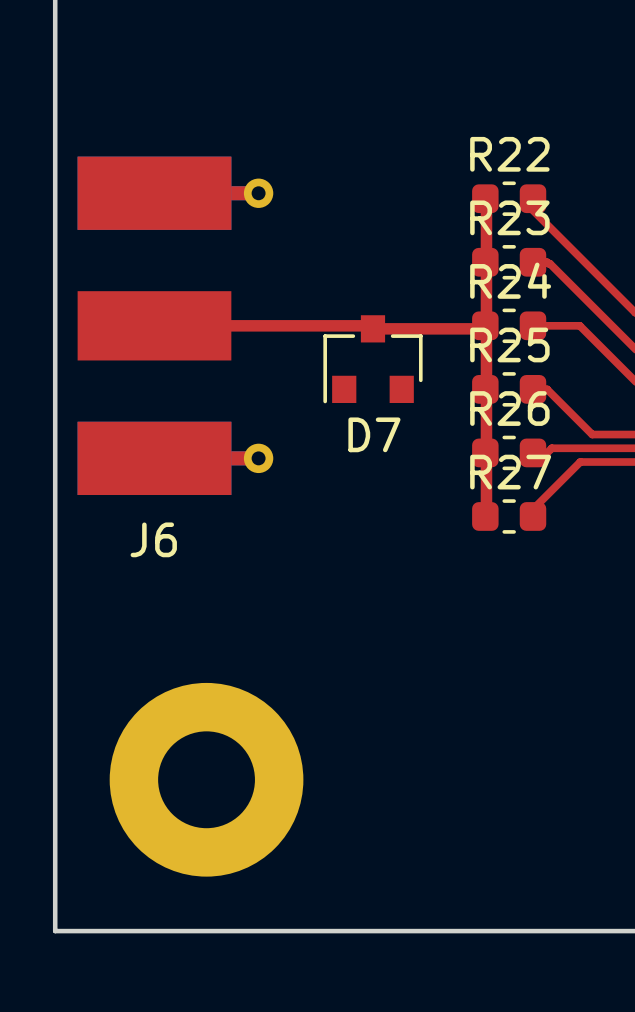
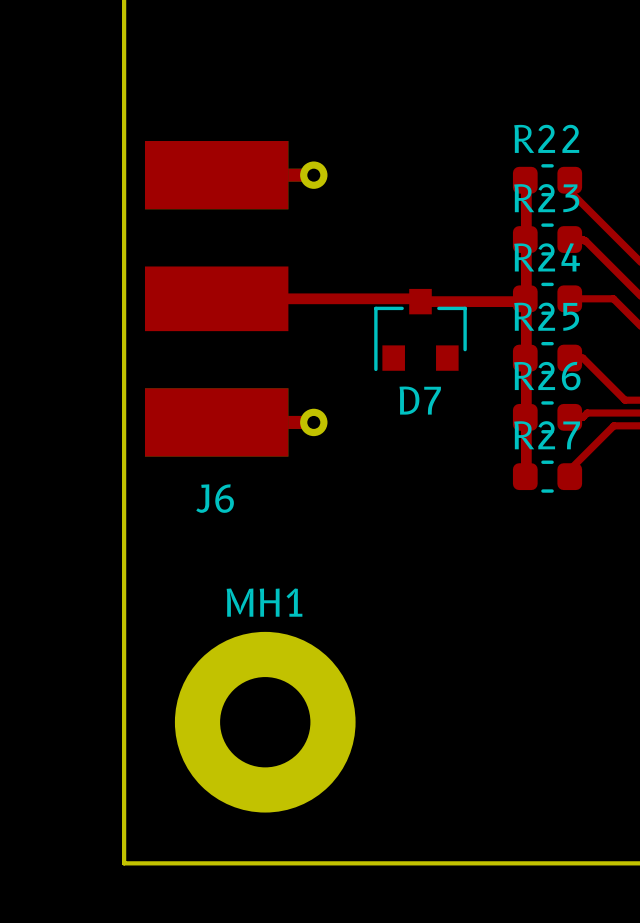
MH1 name: none -> MH1 (264, 602)

